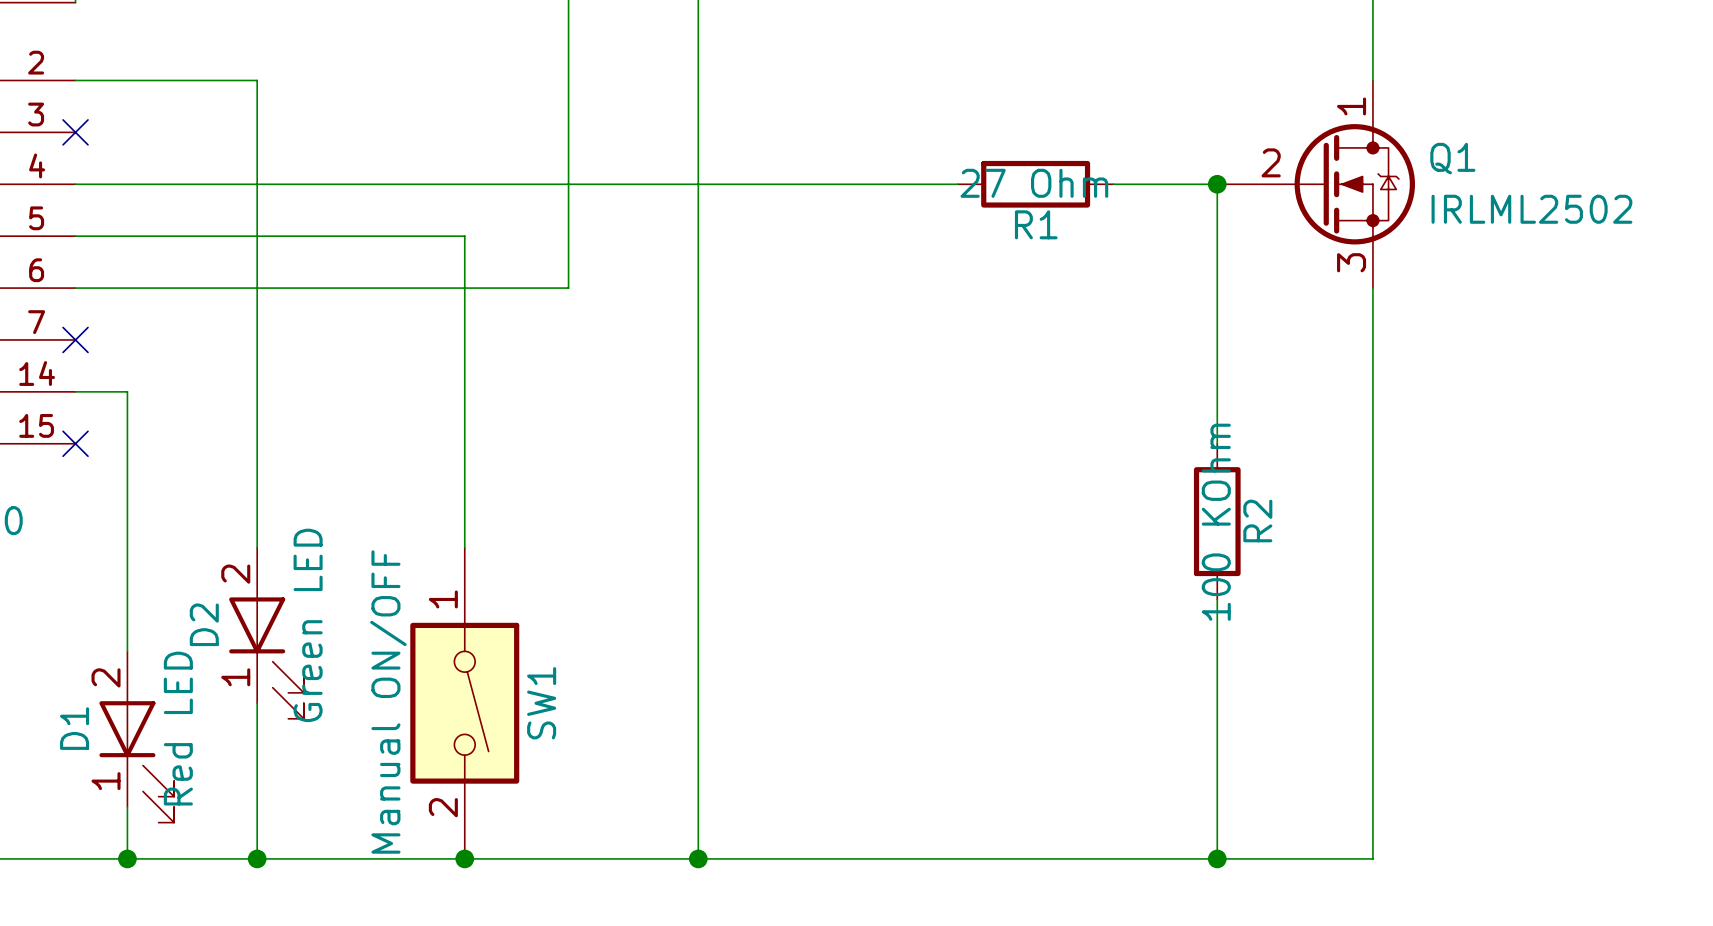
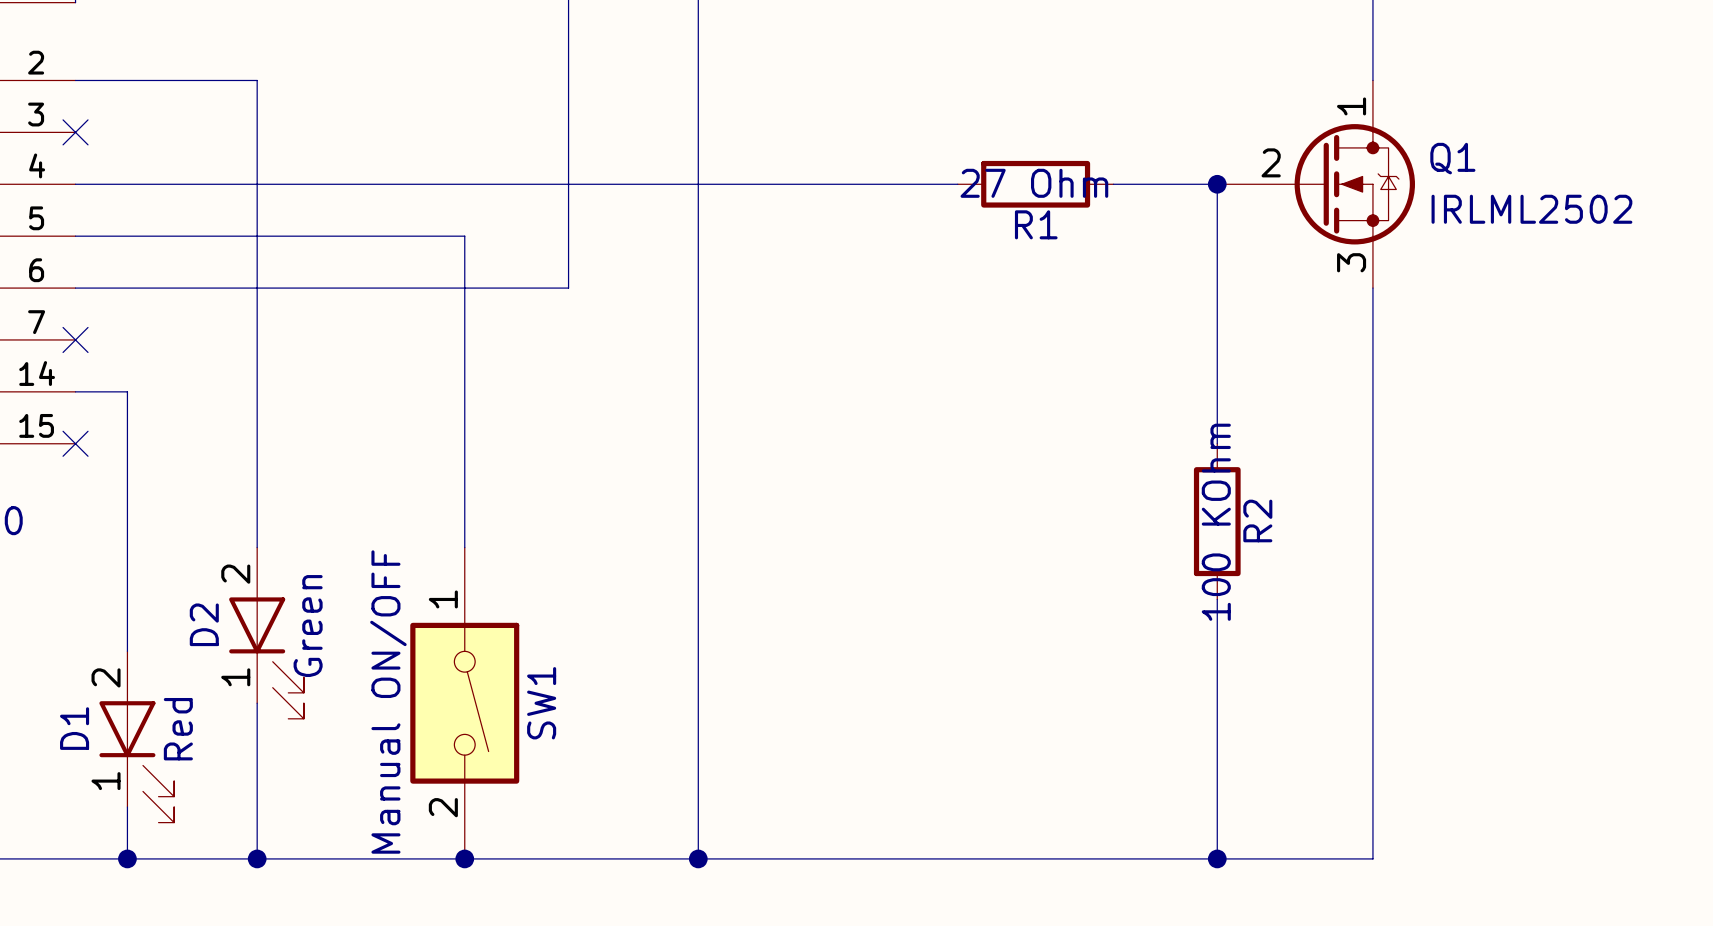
D2 value: Green LED (308, 625) -> Green (308, 626)
D1 value: Red LED (178, 728) -> Red (178, 729)

